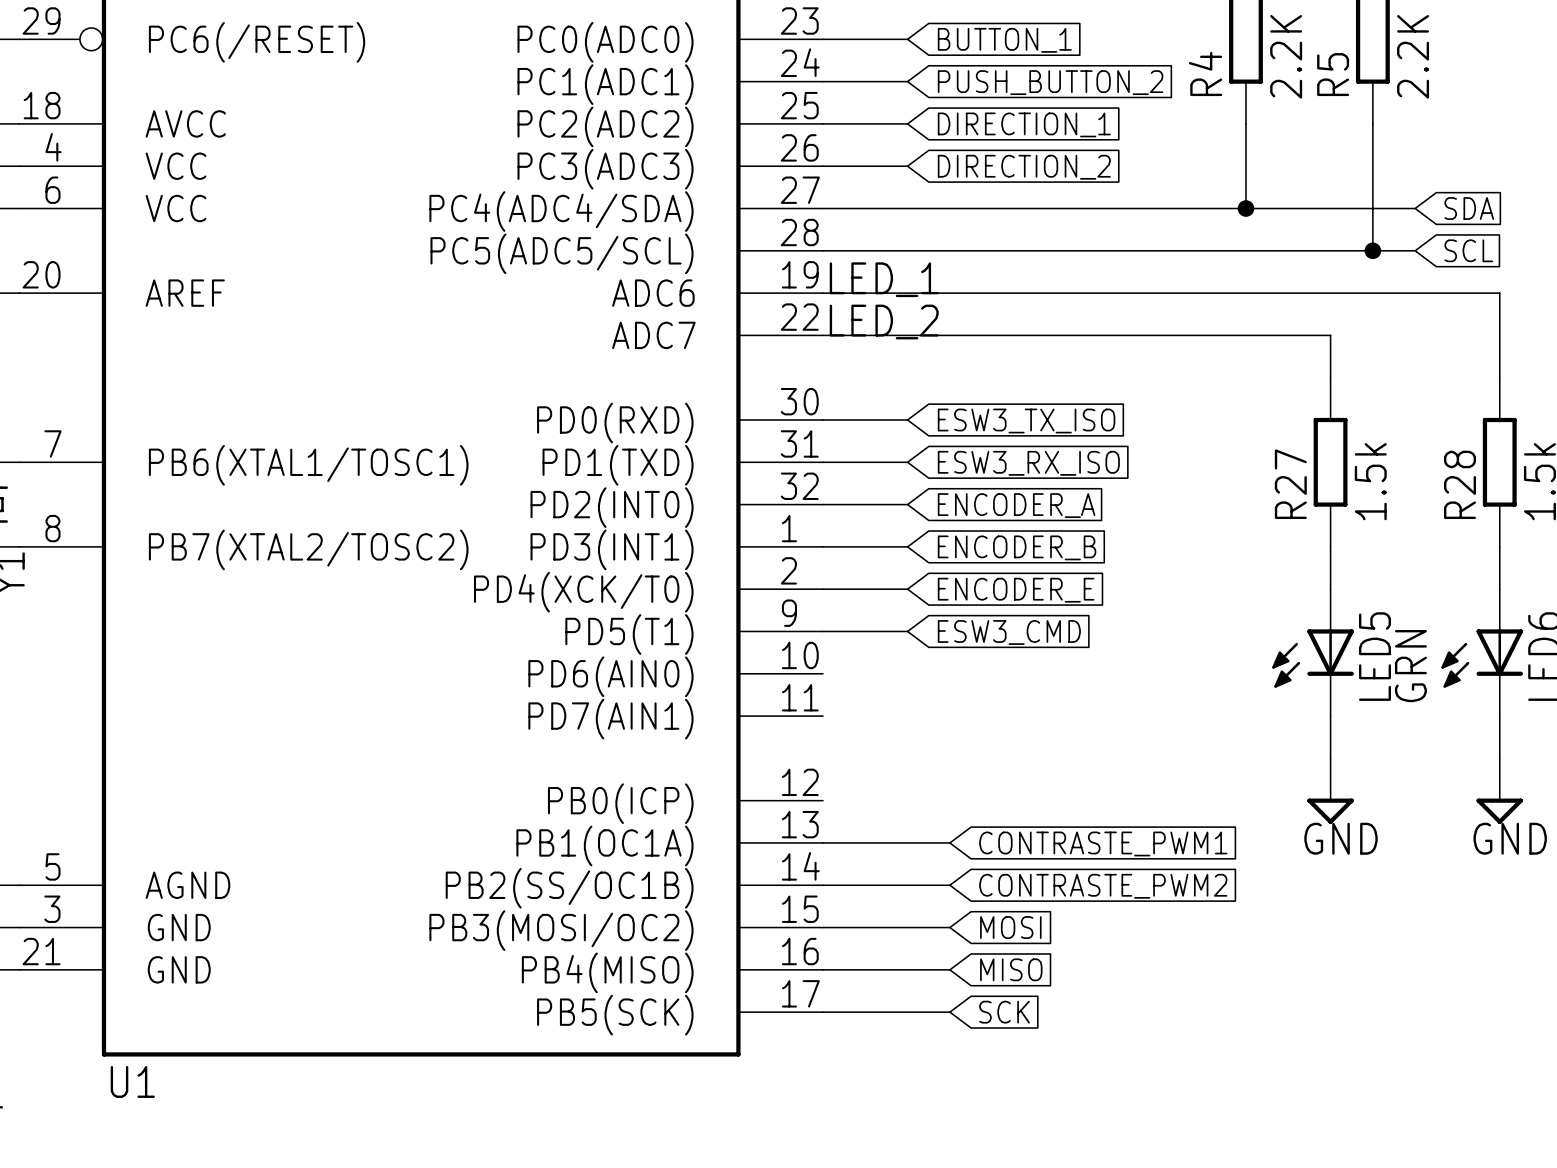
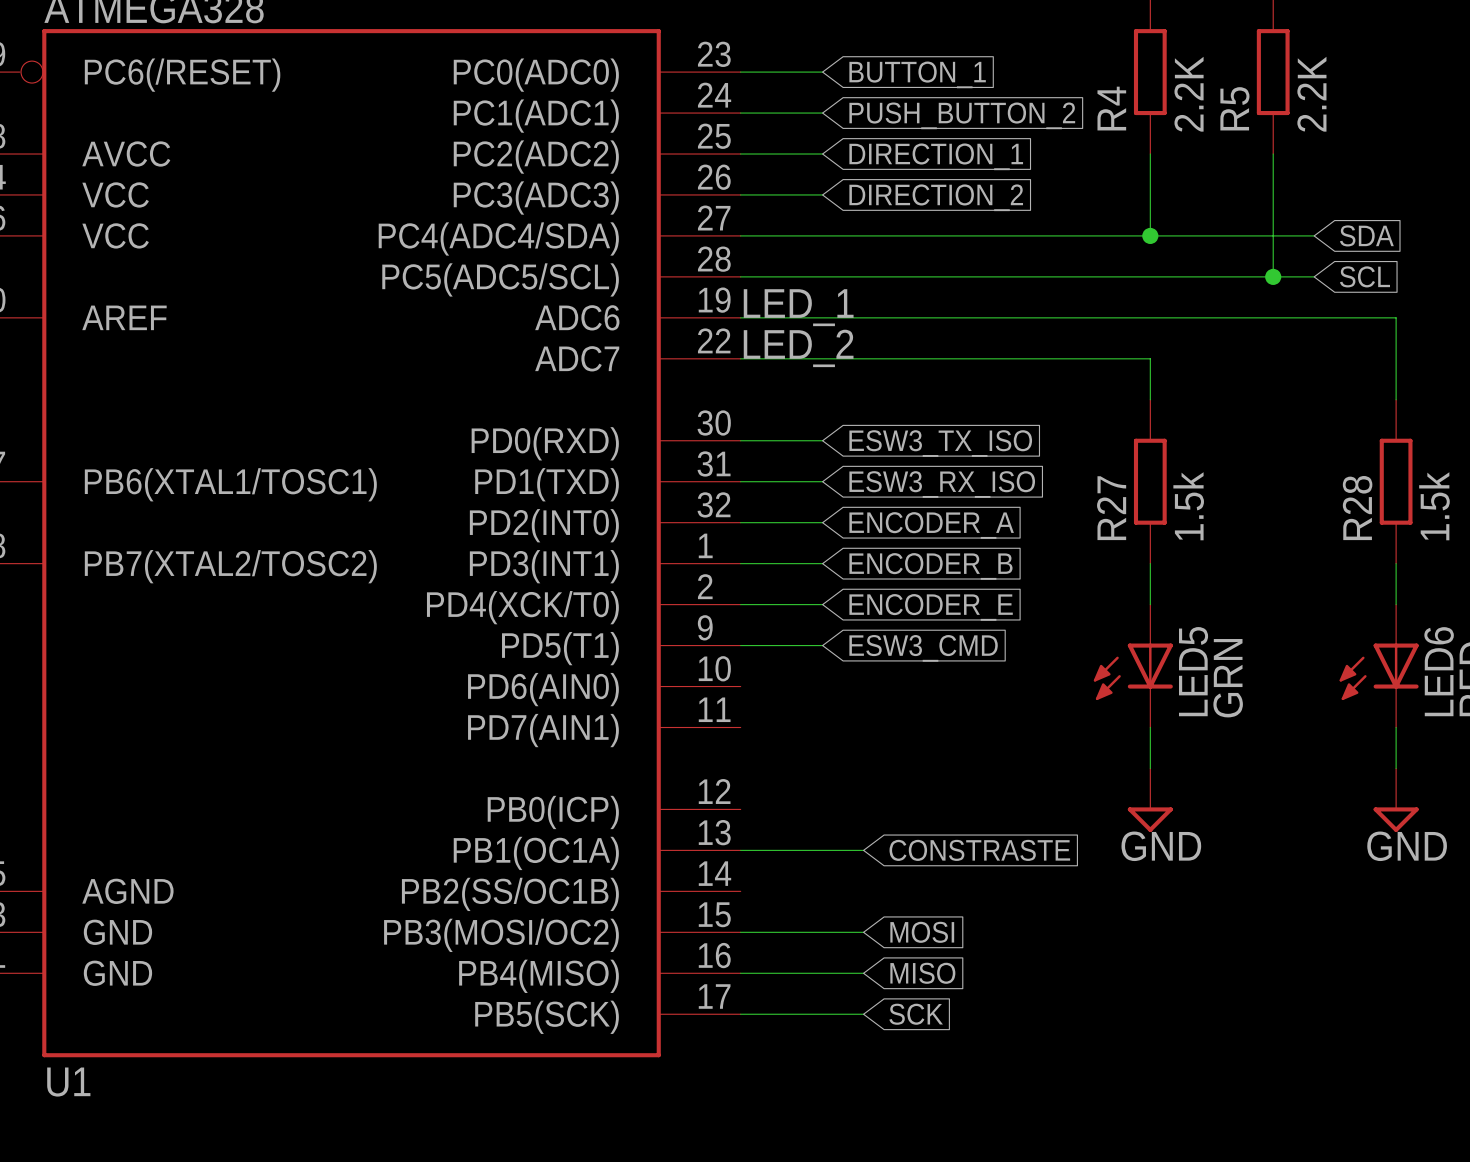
wire: (1245, 335) (1330, 335) (1330, 377) -> (1150, 358) (1150, 399)
R27 position: (1330, 462) -> (1150, 481)
wire: (1330, 546) (1330, 589) -> (1150, 563) (1150, 604)
LED5 position: (1313, 652) -> (1133, 666)
wire: (1330, 716) (1330, 758) -> (1150, 727) (1150, 768)
power symbol position: GND (1330, 791) -> GND (1150, 800)
global label: CONTRASTE_PWM1 (1103, 843) -> CONSTRASTE (979, 850)
wire: (823, 885) (949, 885) -> none
global label: CONTRASTE_PWM2 (1103, 886) -> none

